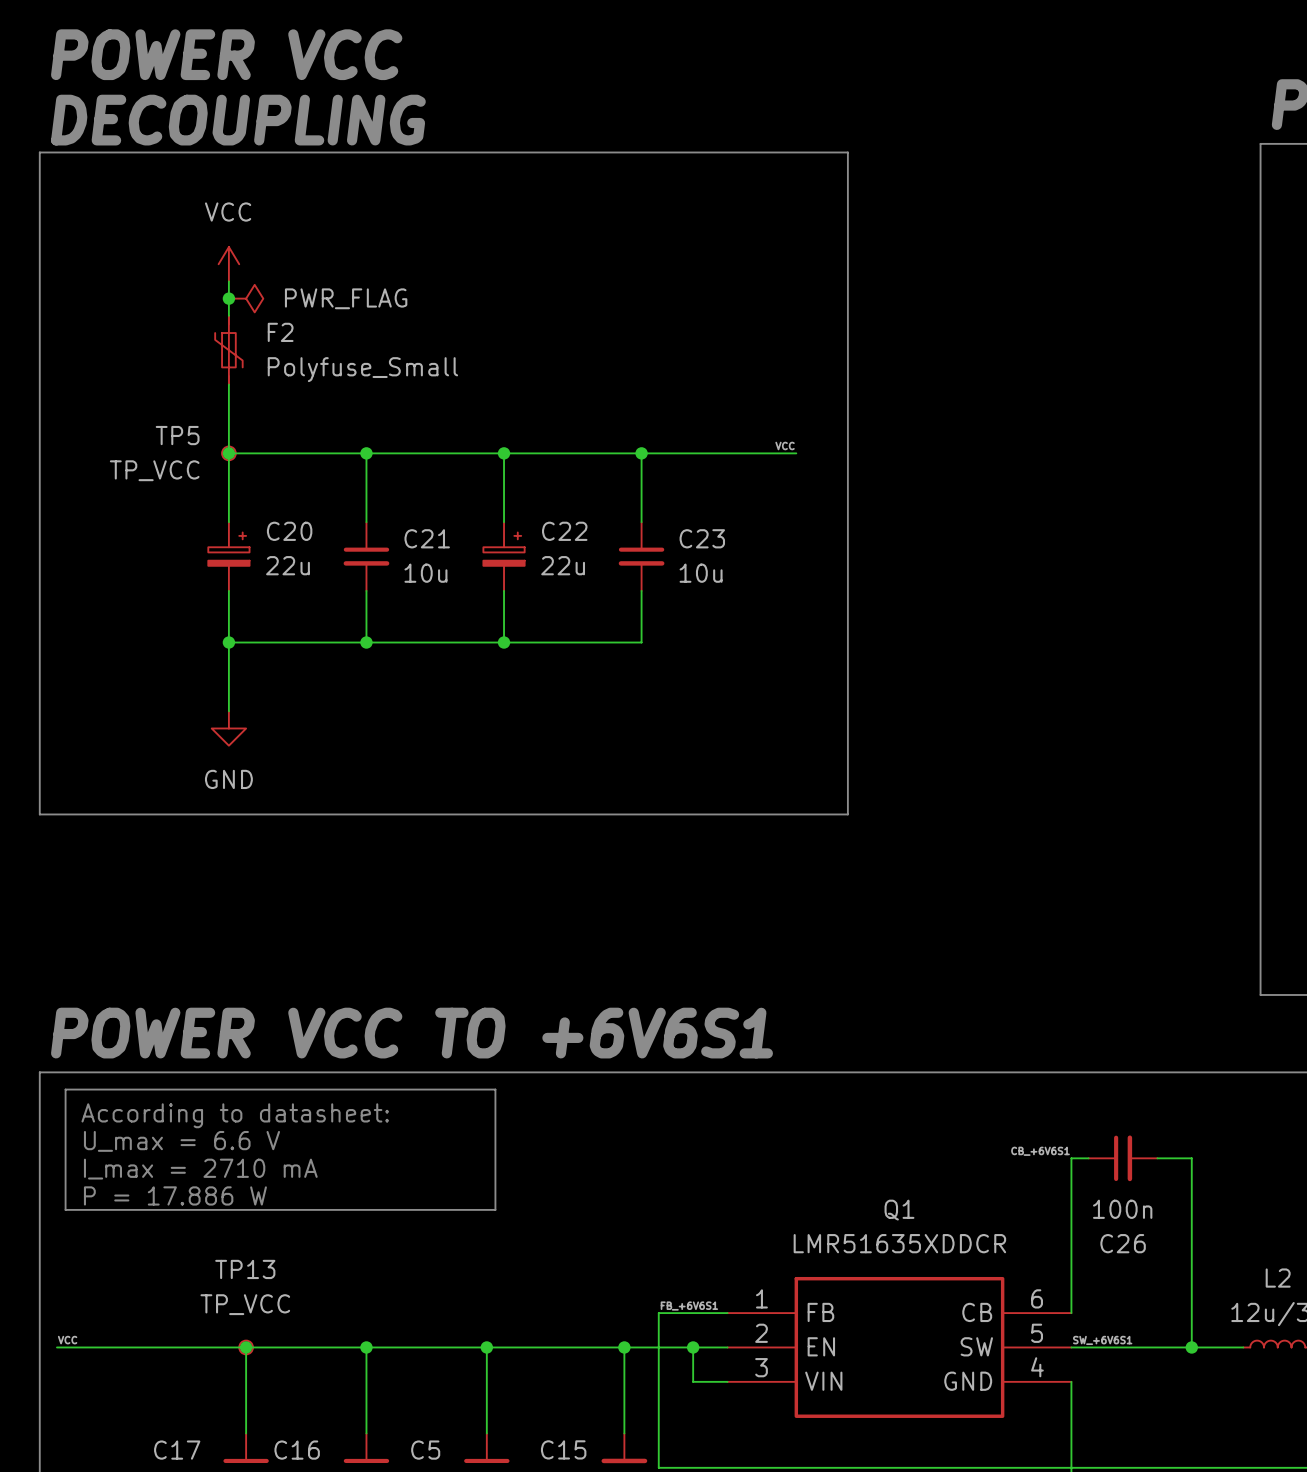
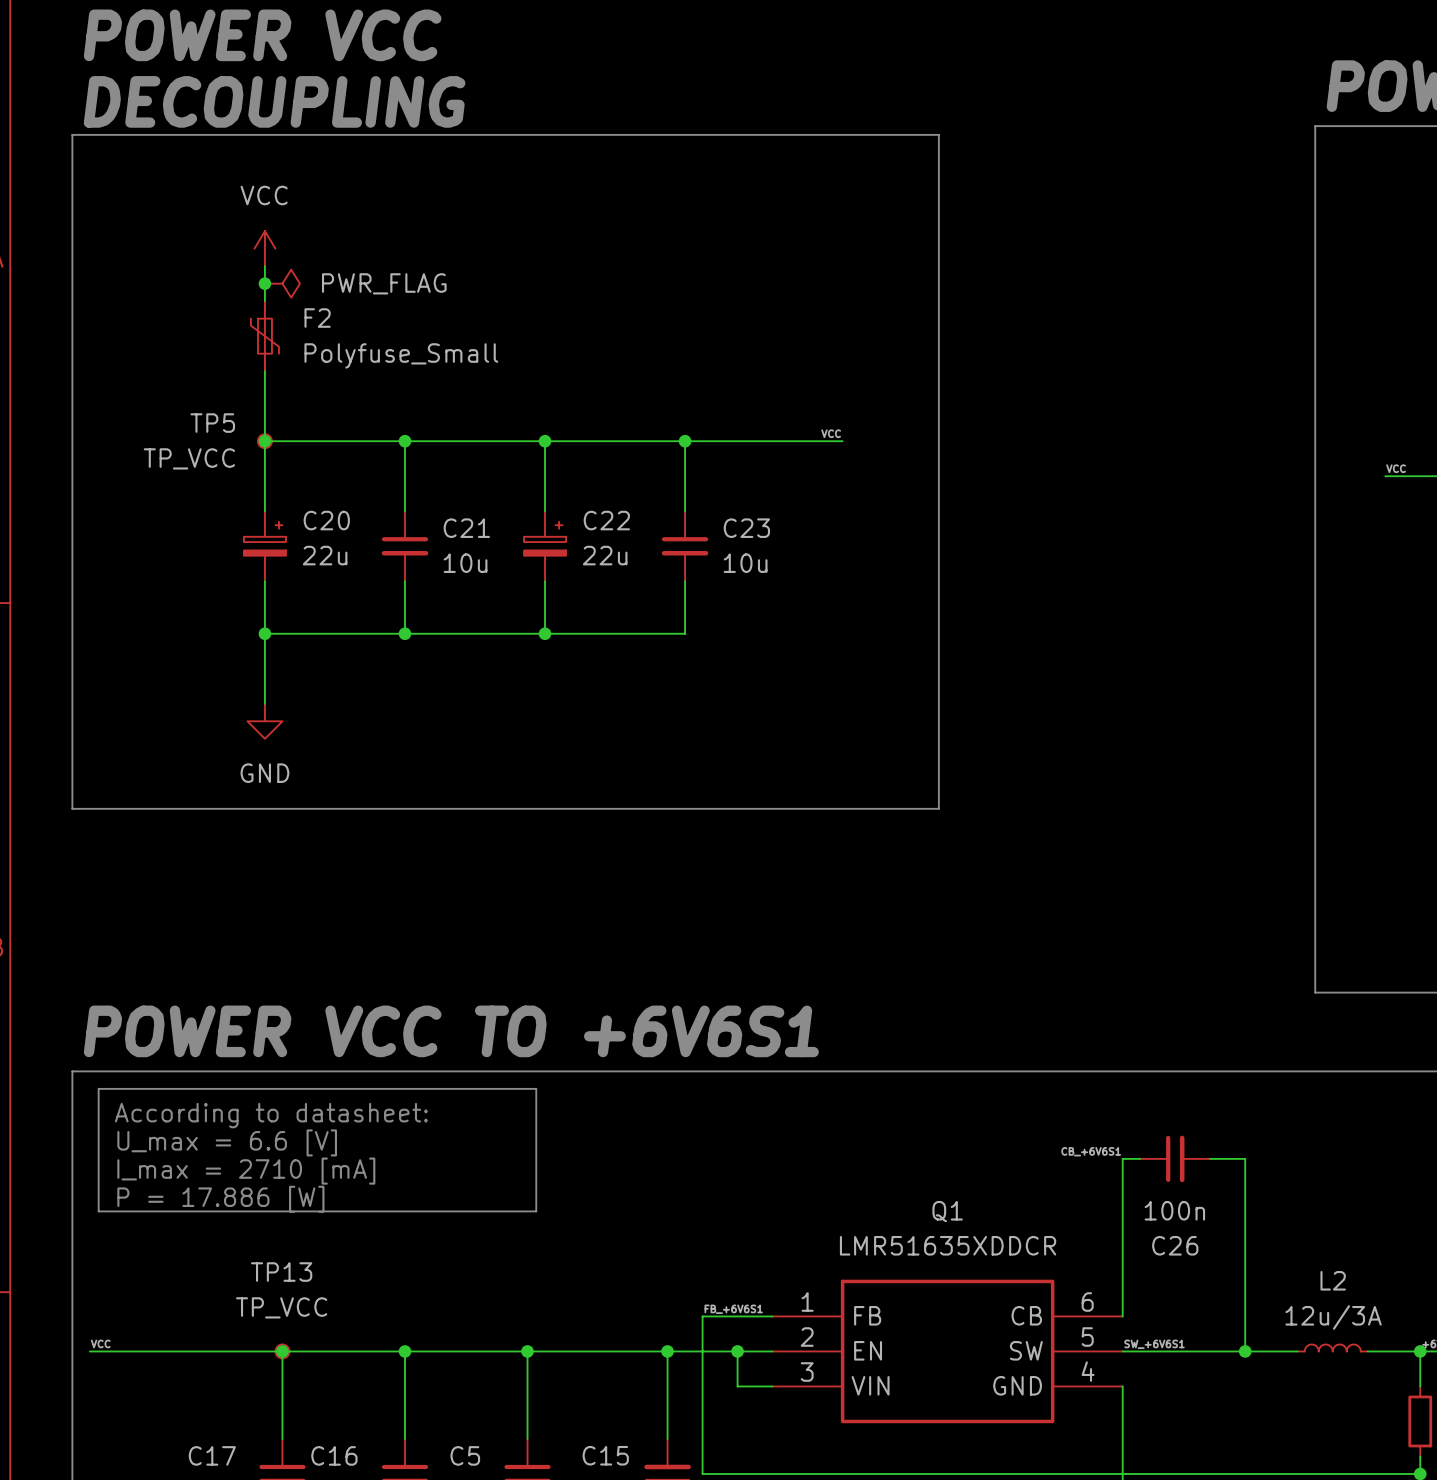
line: (847, 152) (847, 814) -> (895, 134) (938, 134) (938, 808) (895, 808)
text: U_max = 6.6 V (181, 1141) -> U_max = 6.6 [V] (227, 1142)
text: I_max = 2710 mA (200, 1169) -> I_max = 2710 [mA] (246, 1171)
text: P = 17.886 W (175, 1195) -> P = 17.886 [W] (220, 1199)

